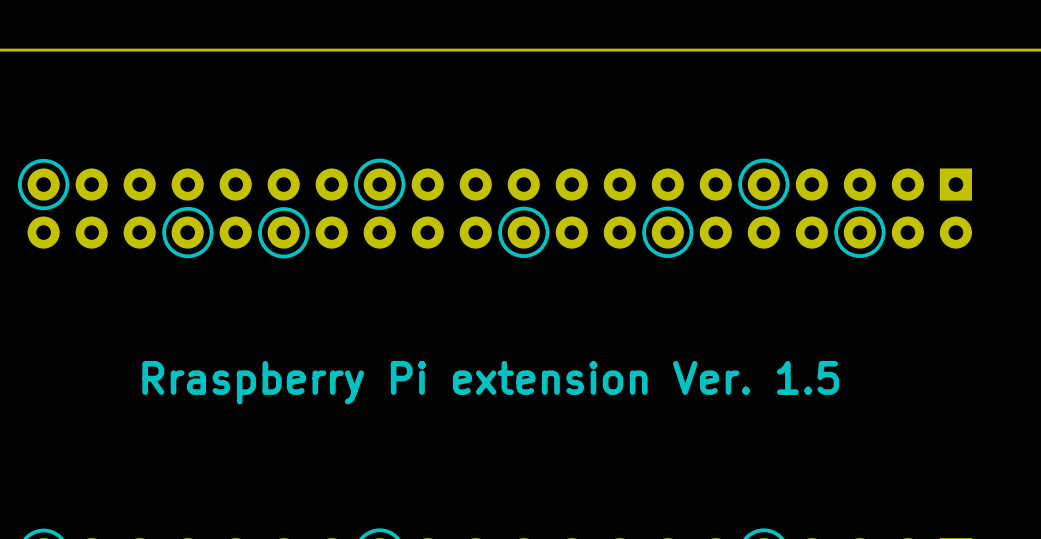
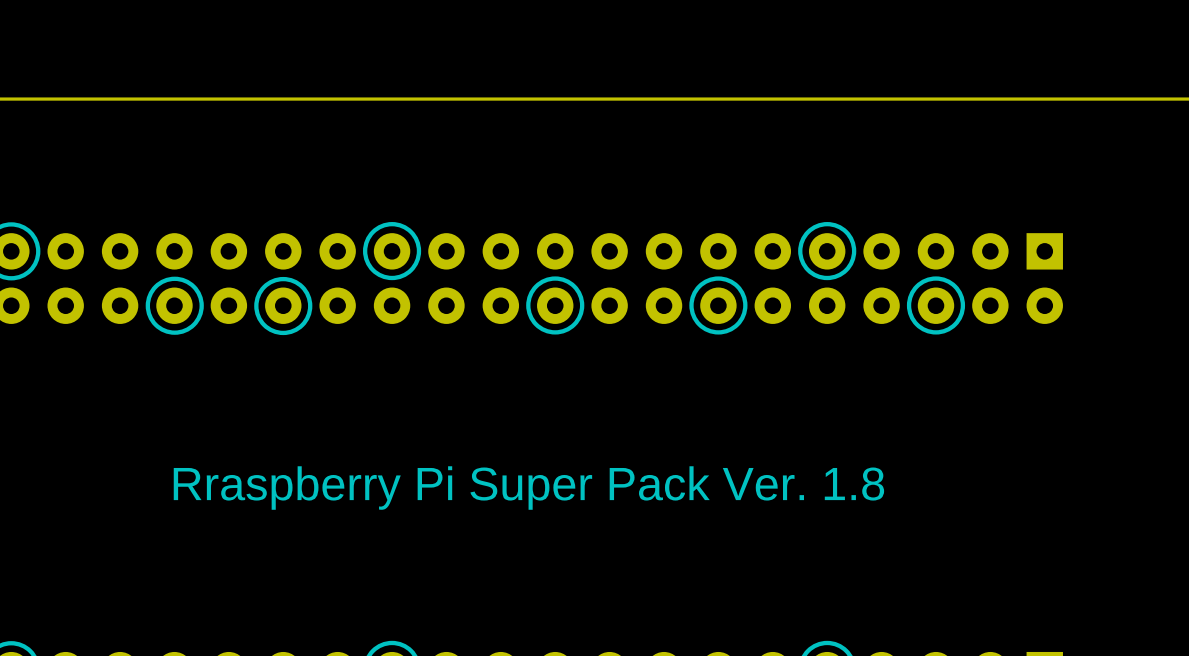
text: Rraspberry Pi extension Ver. 1.5 (490, 382) -> Rraspberry Pi Super Pack Ver. 1.8 (528, 488)

